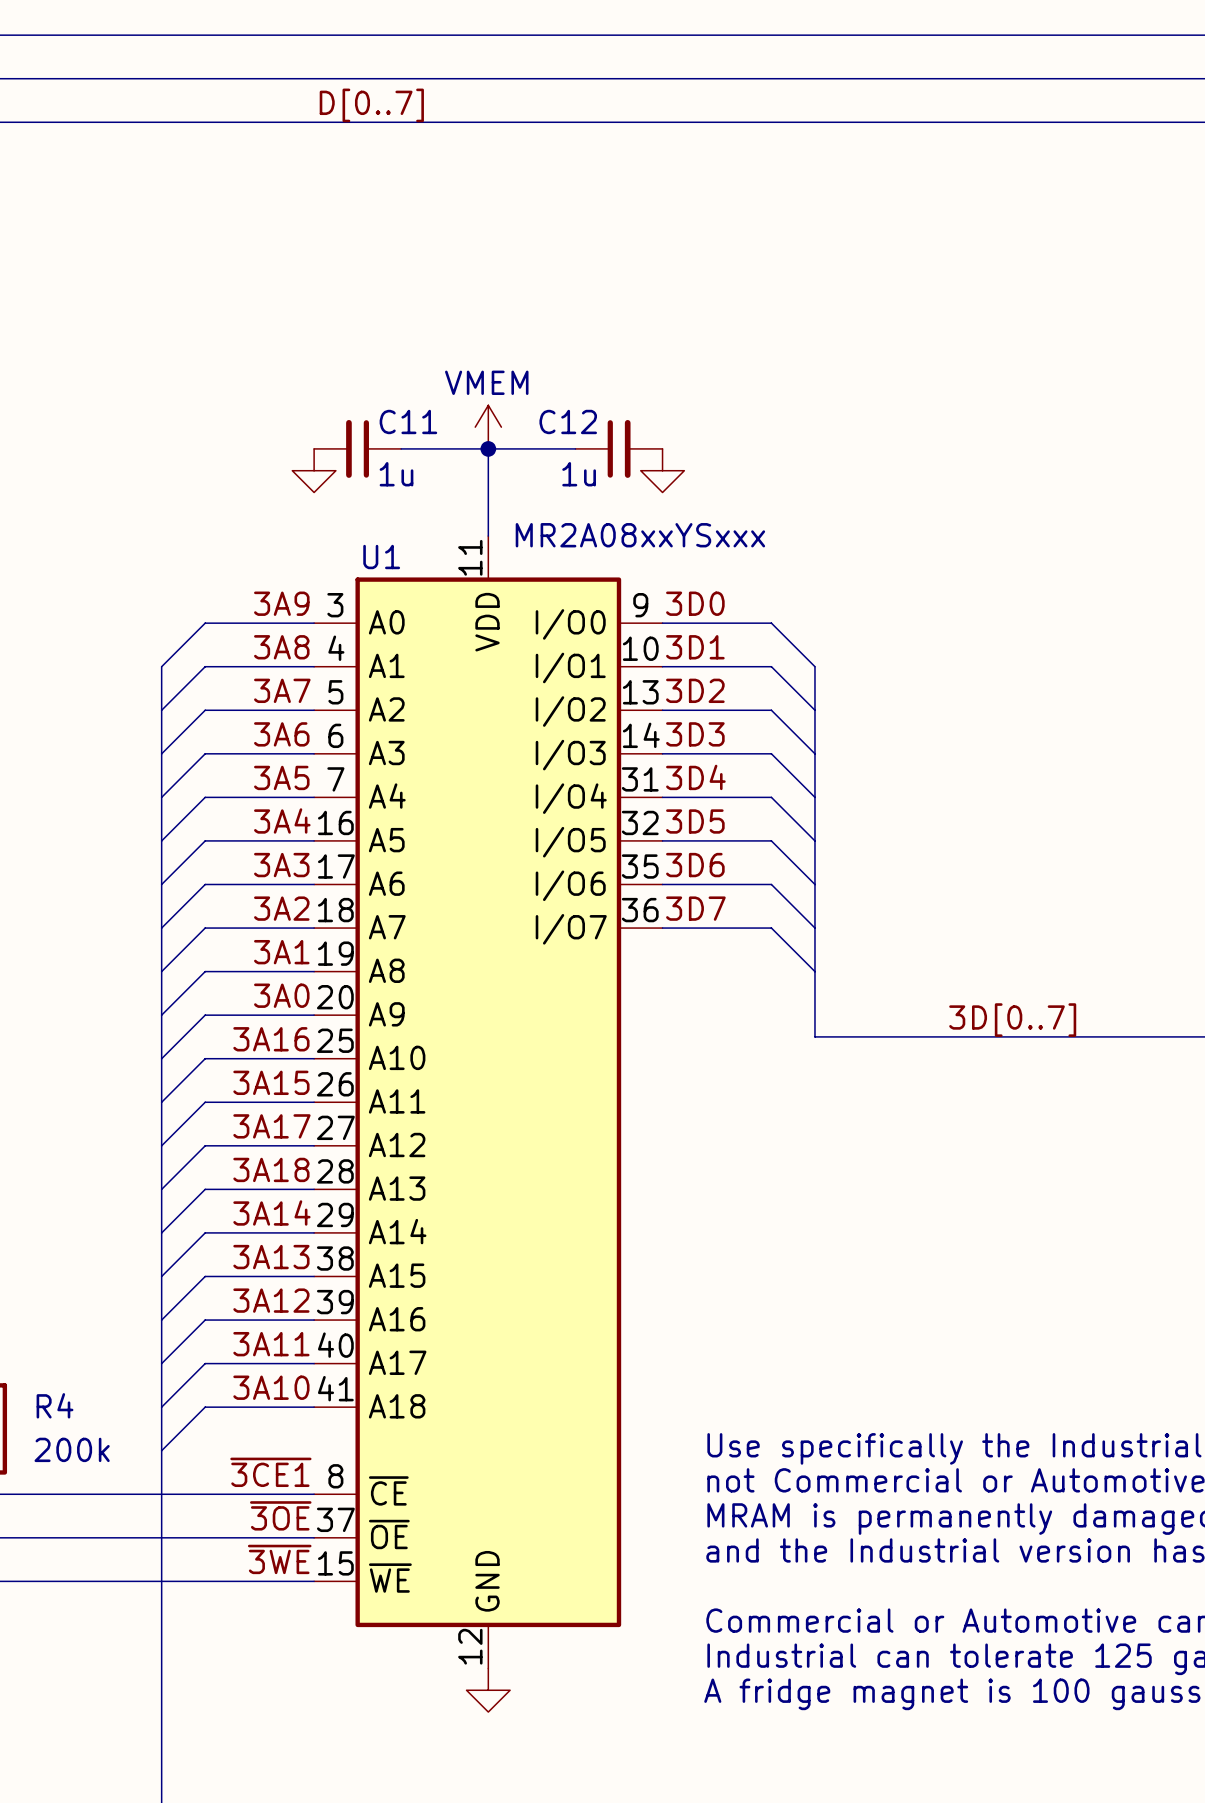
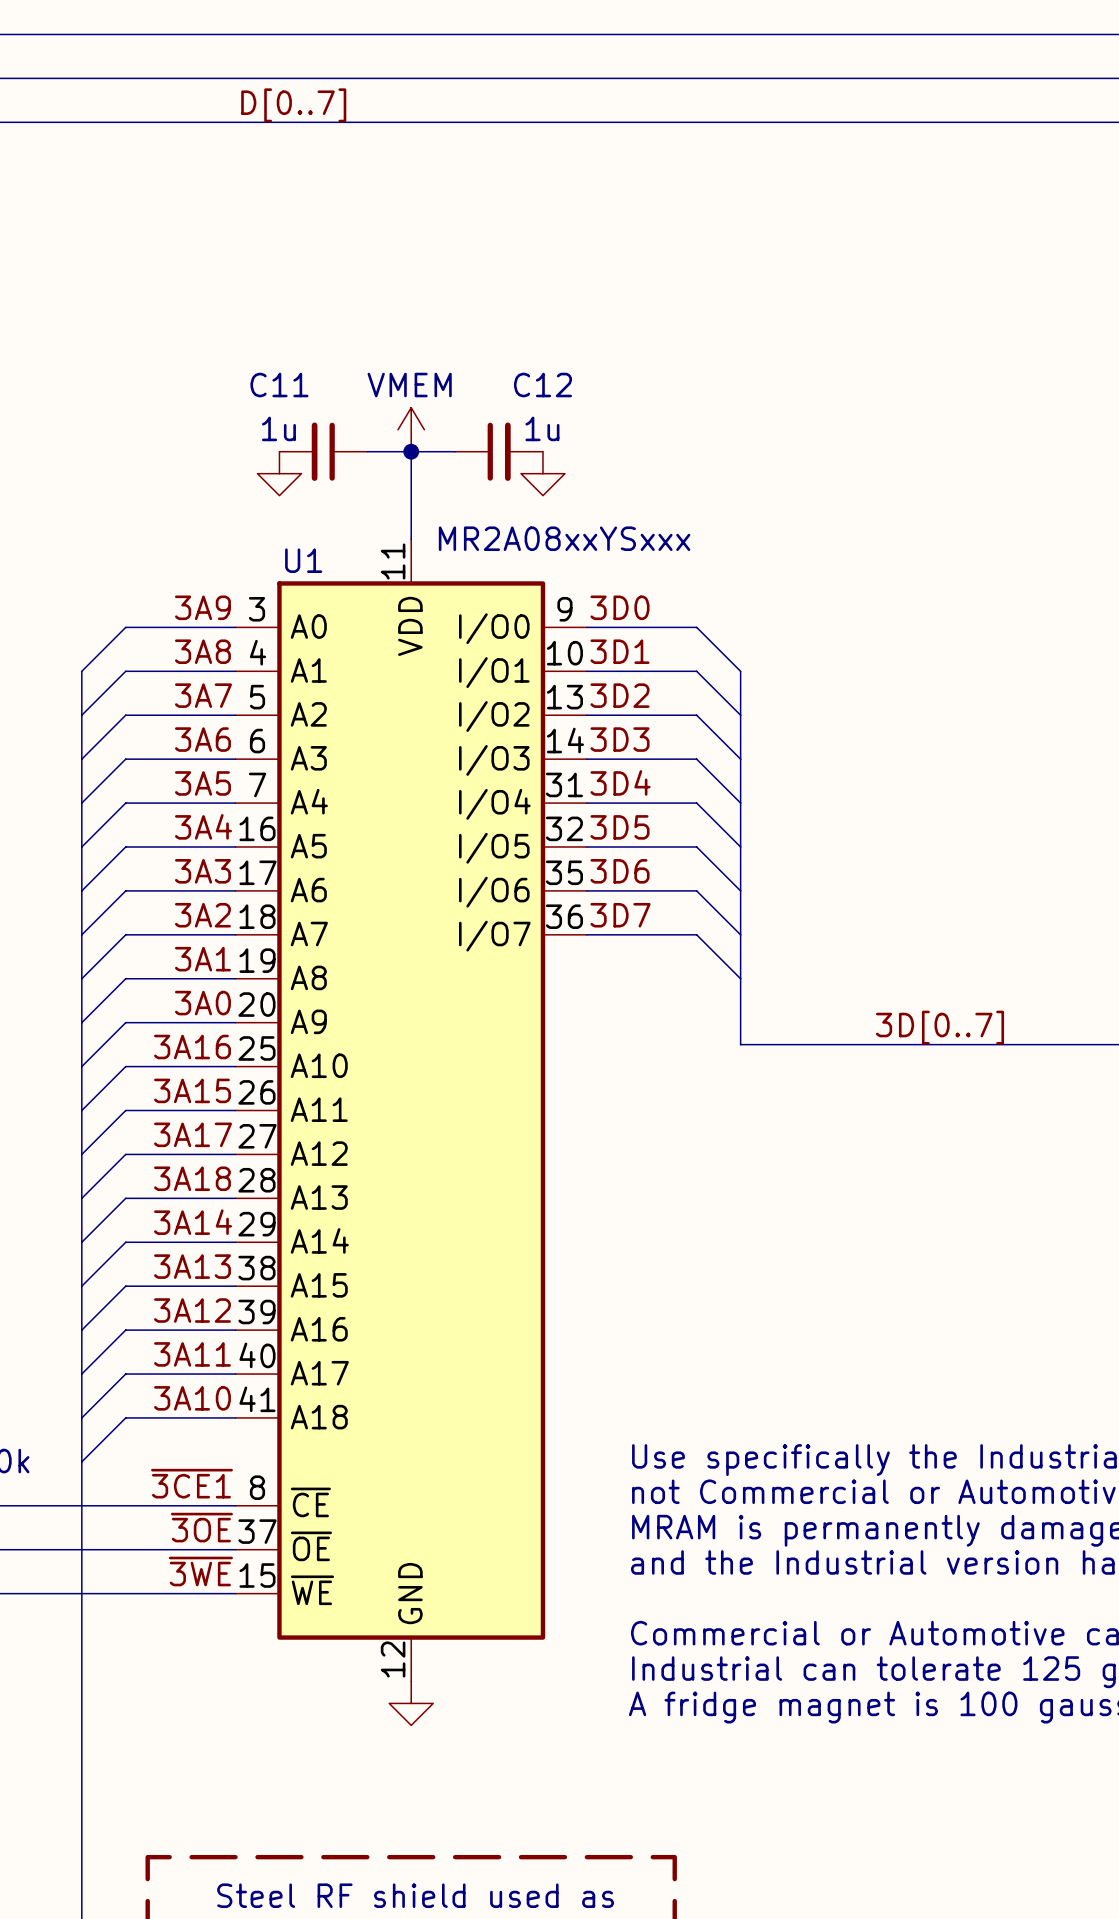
C11 name position: C11 (408, 421) -> C11 (279, 385)
C12 name position: C12 (568, 421) -> C12 (542, 385)
C11 position: (357, 448) -> (323, 451)
C12 position: (618, 448) -> (499, 451)
power symbol position: (314, 470) -> (279, 473)
power symbol position: (662, 470) -> (542, 473)
C11 value position: 1u (396, 474) -> 1u (278, 428)
C12 value position: 1u (579, 474) -> 1u (542, 428)

